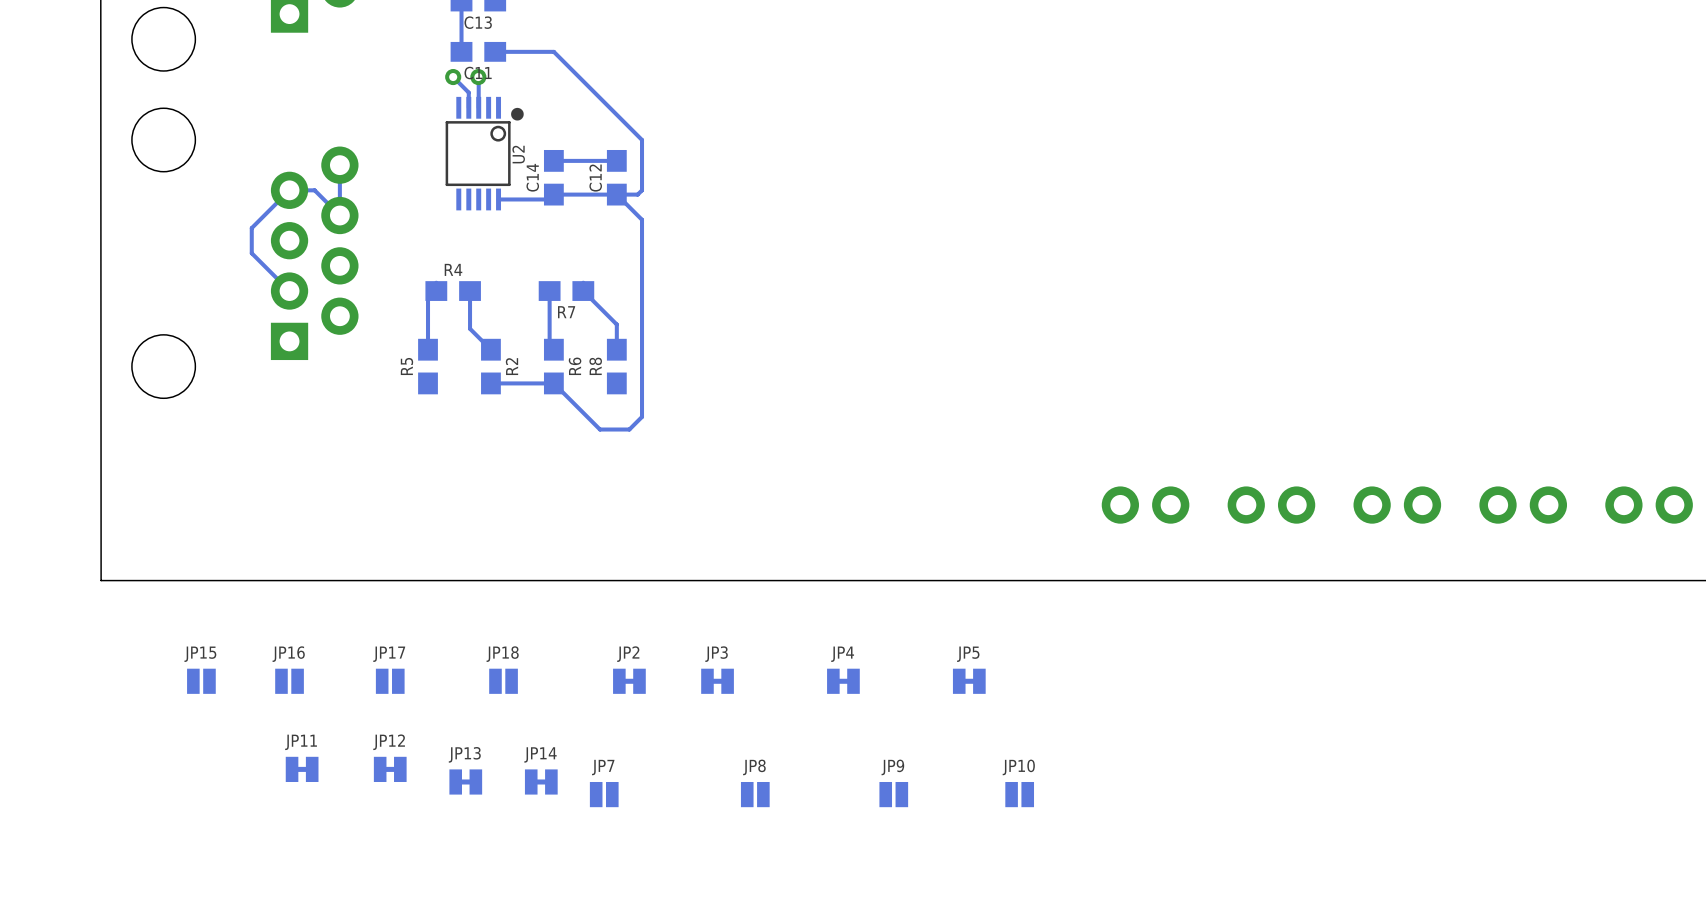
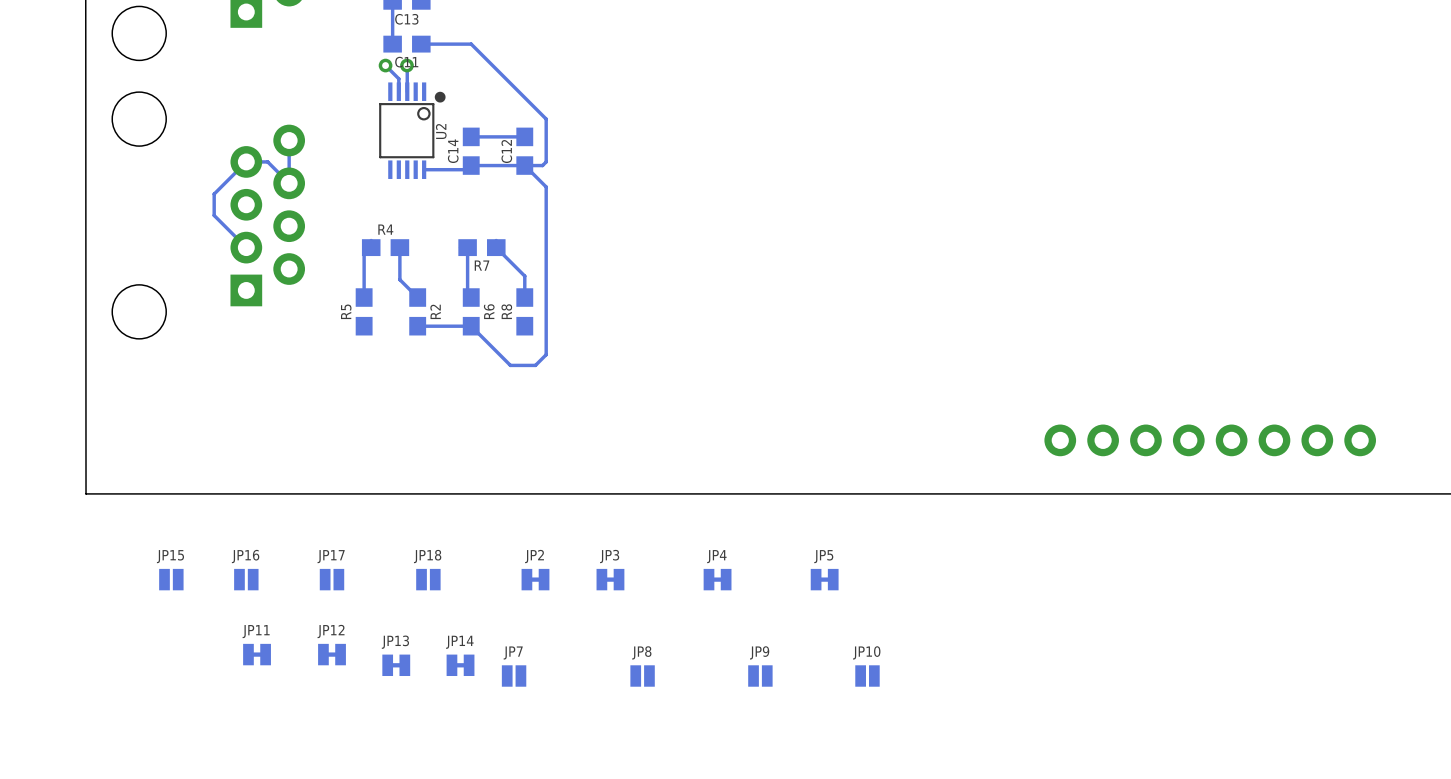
part: (1145, 505) -> none
part: (1271, 505) -> none
part: (1397, 505) -> none
part: (1523, 505) -> none
part: (1649, 505) -> none
part: none -> (1210, 440)

